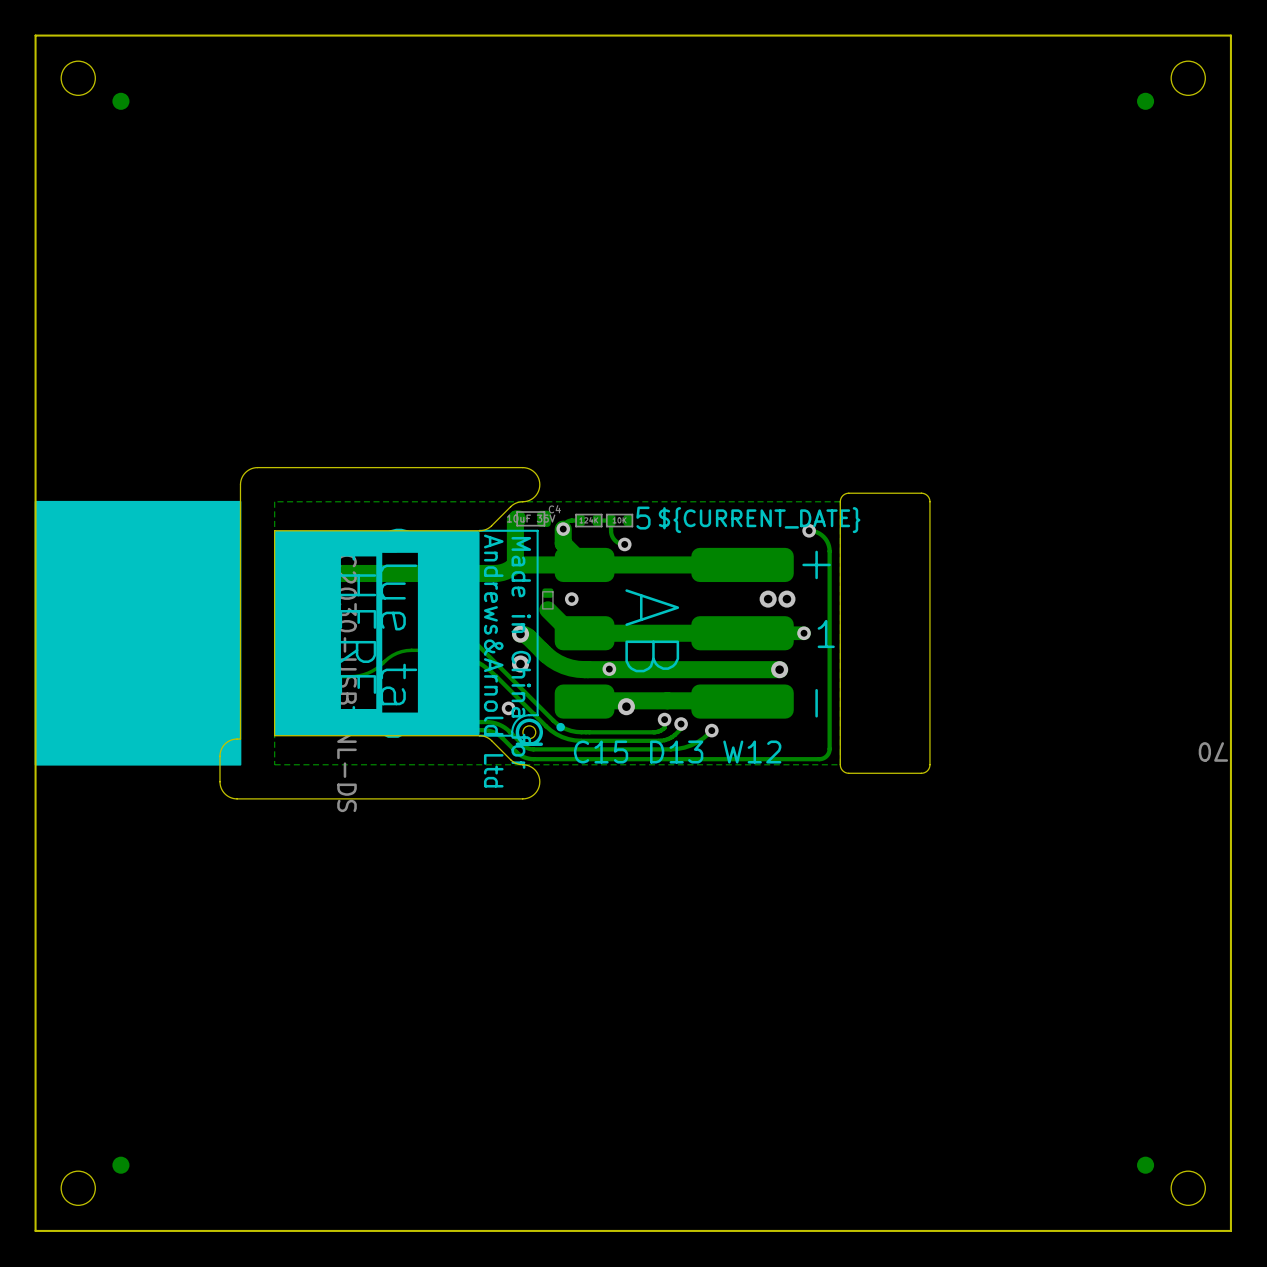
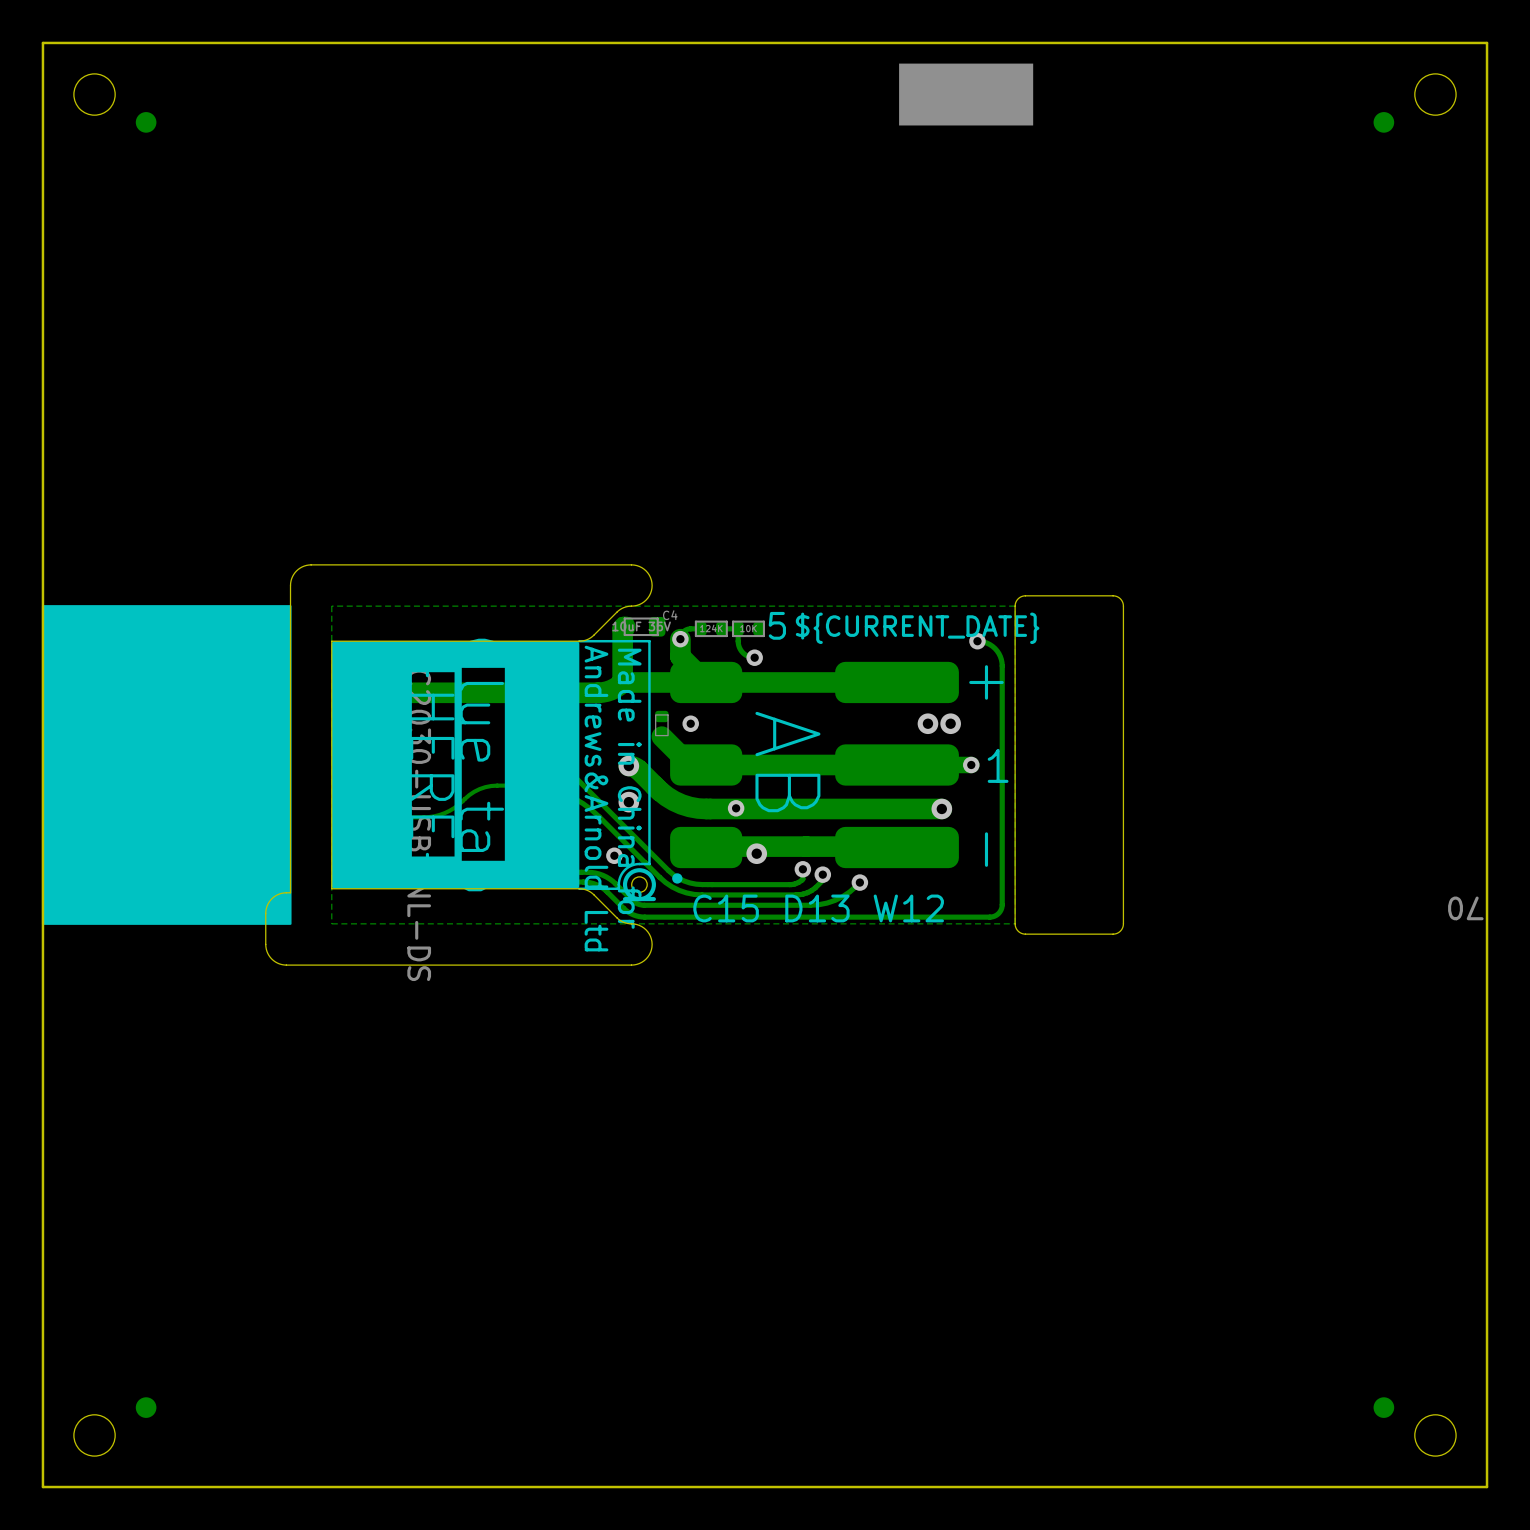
part footprint: [34, 34, 1232, 1232] -> [41, 41, 1489, 1489]

